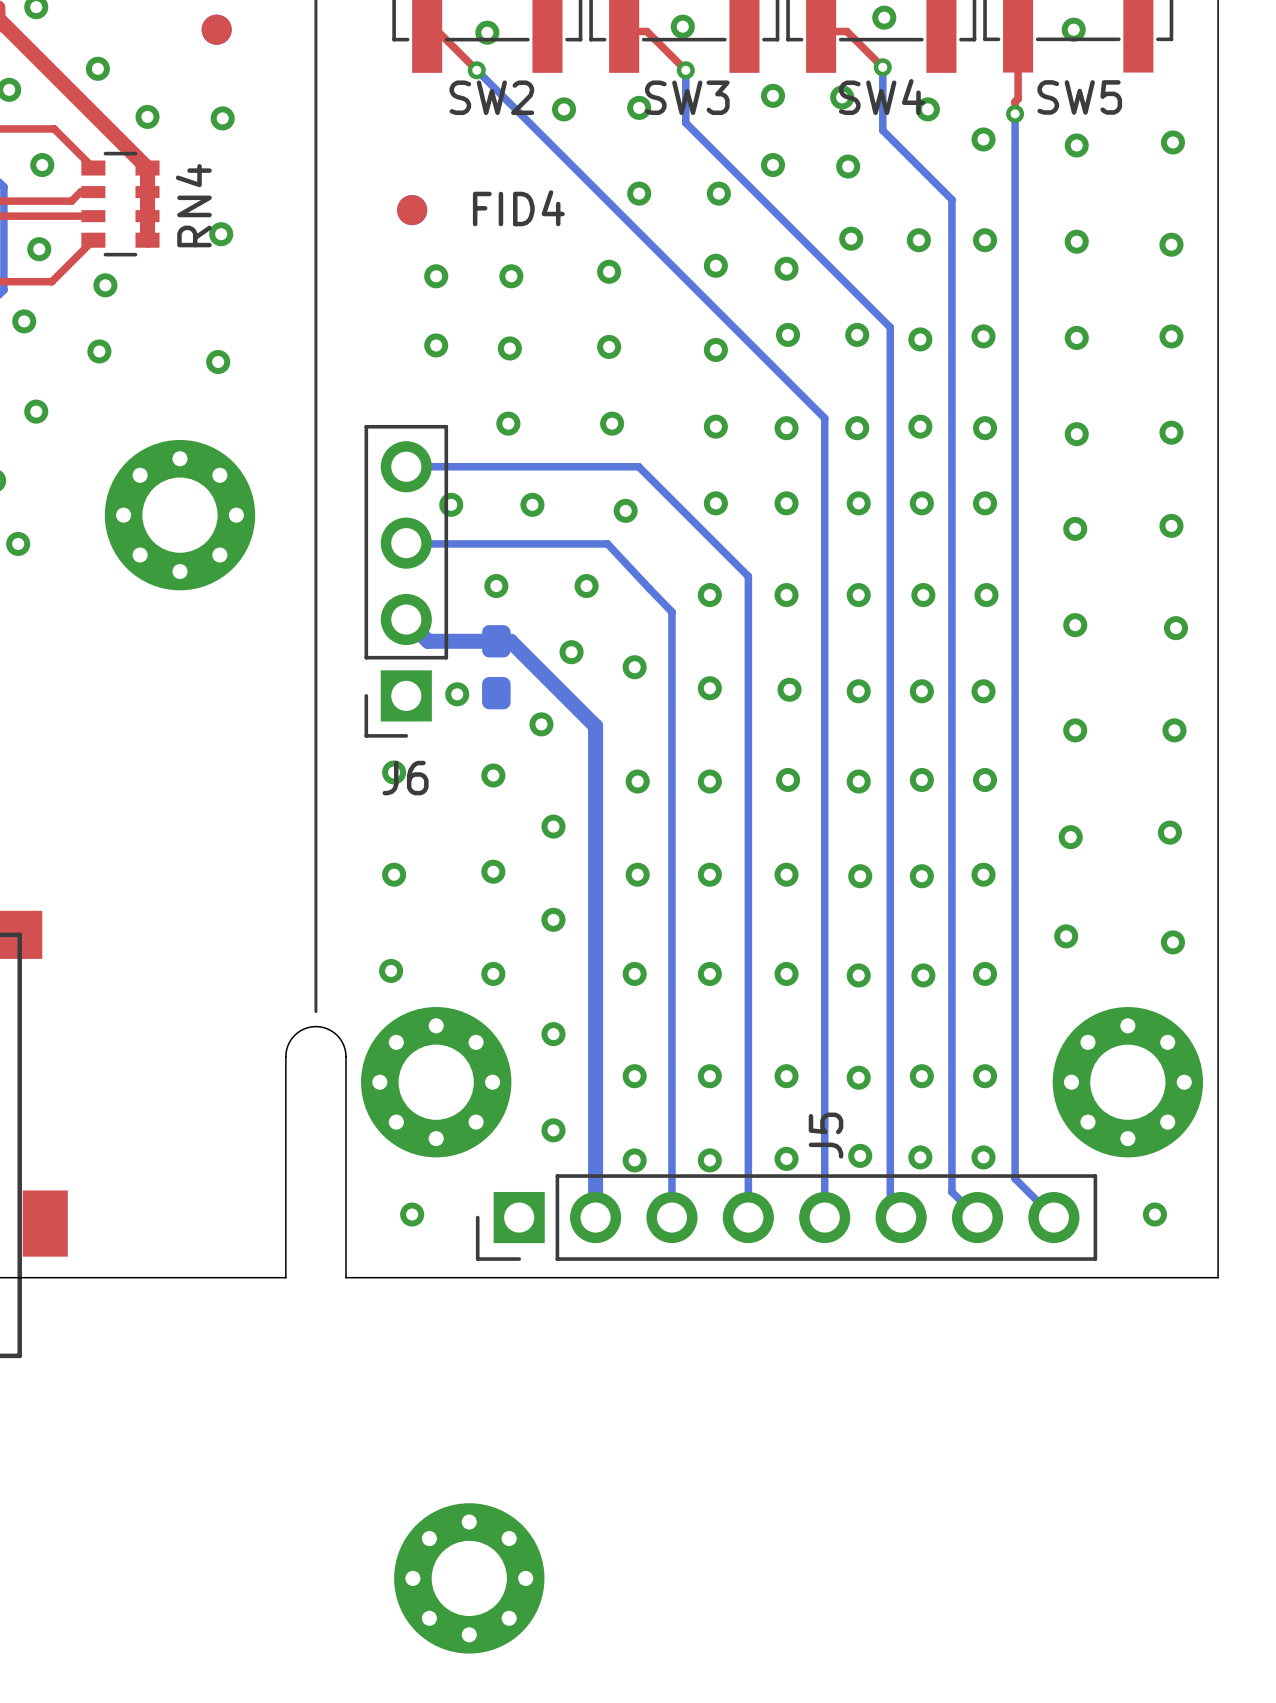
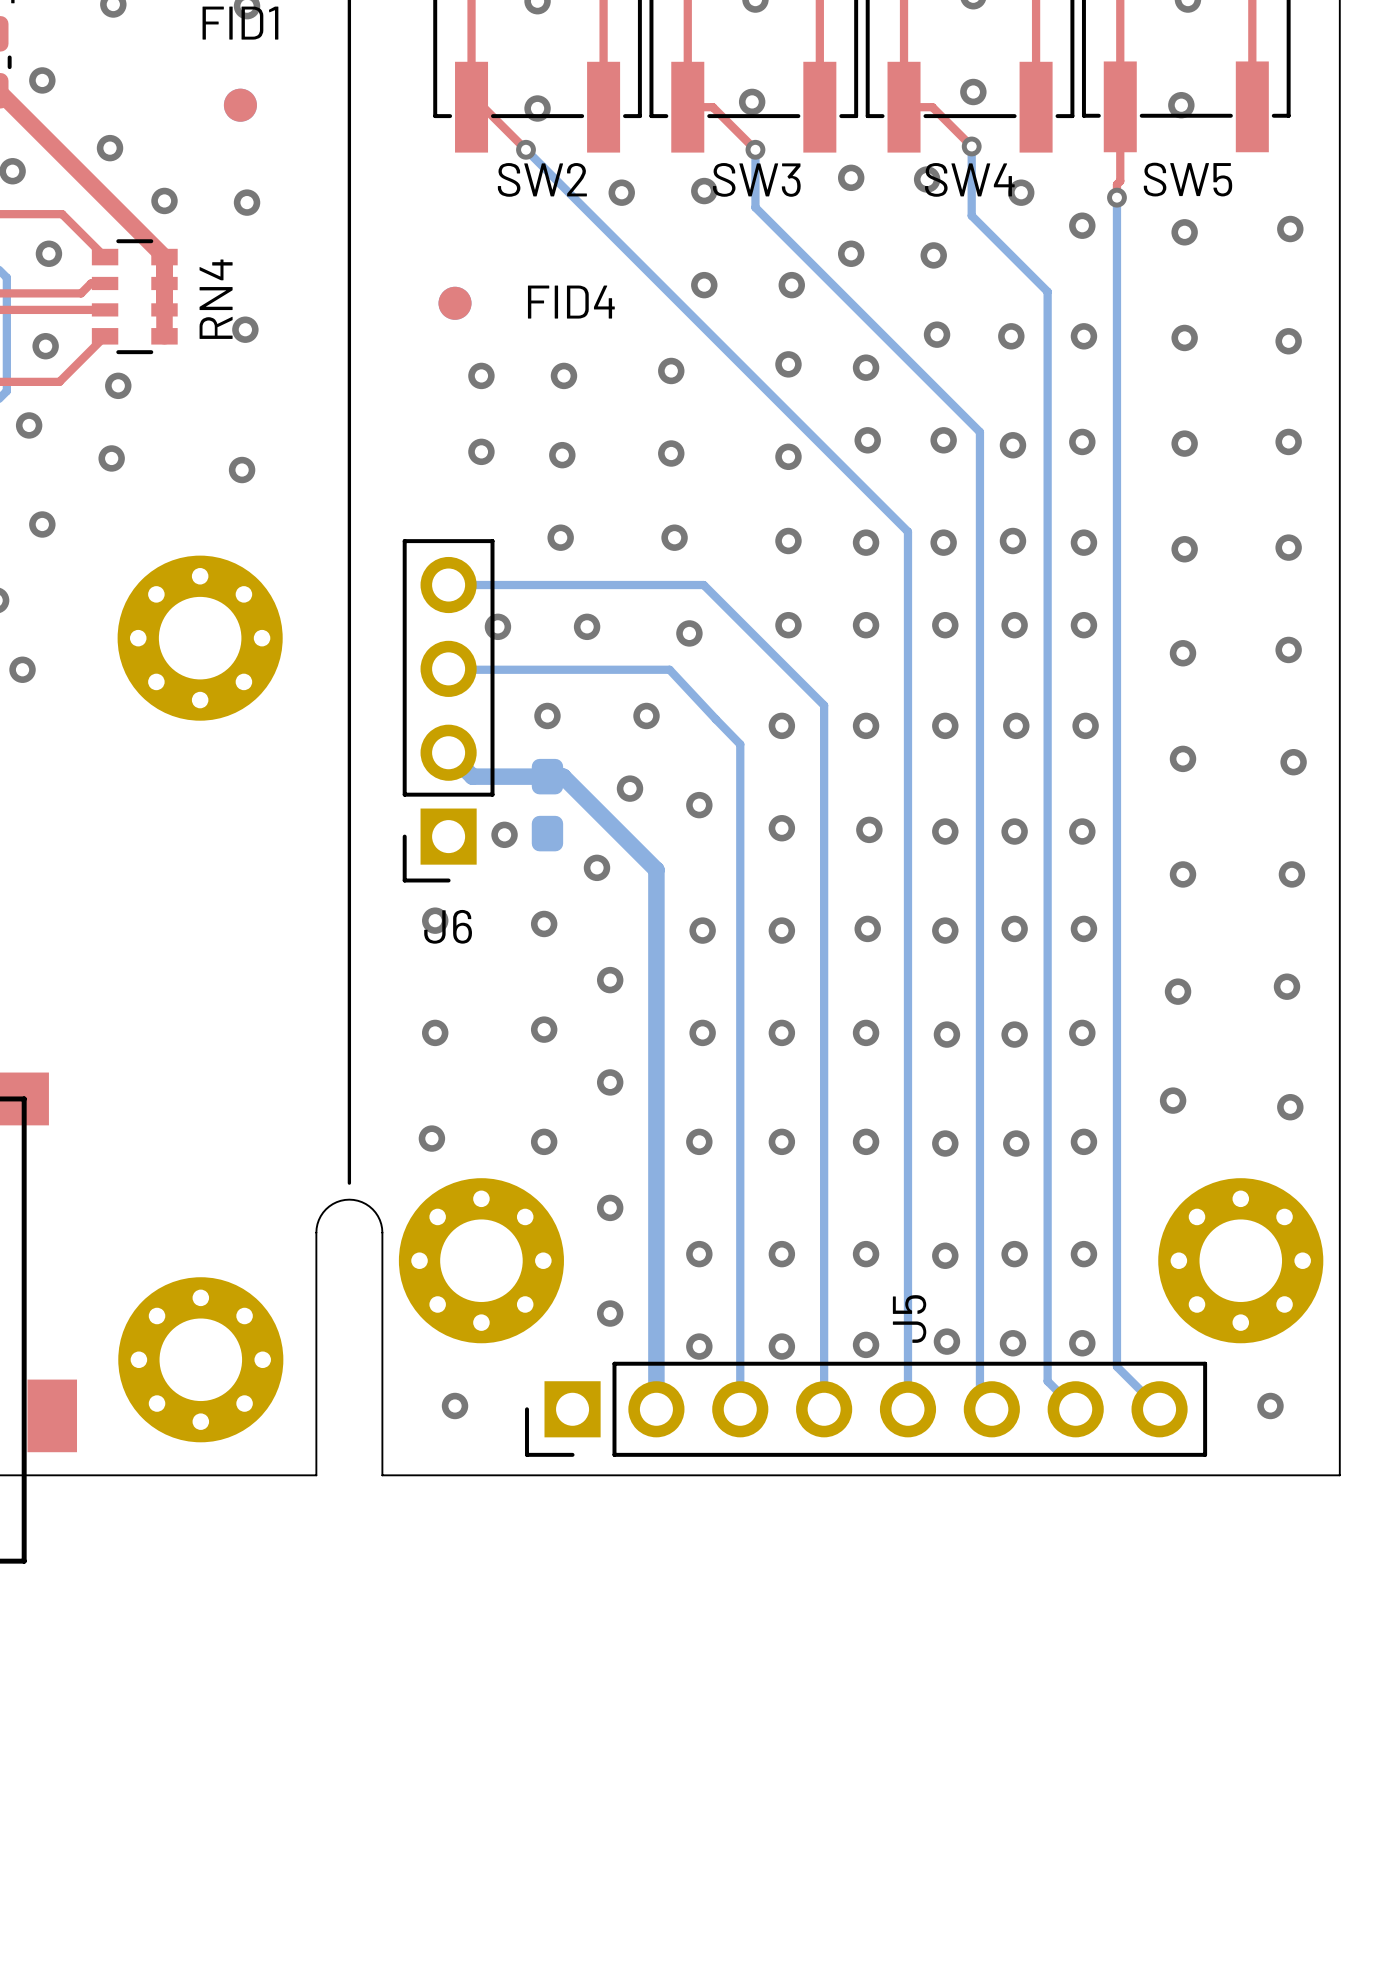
part position: (469, 1578) -> (200, 1359)

